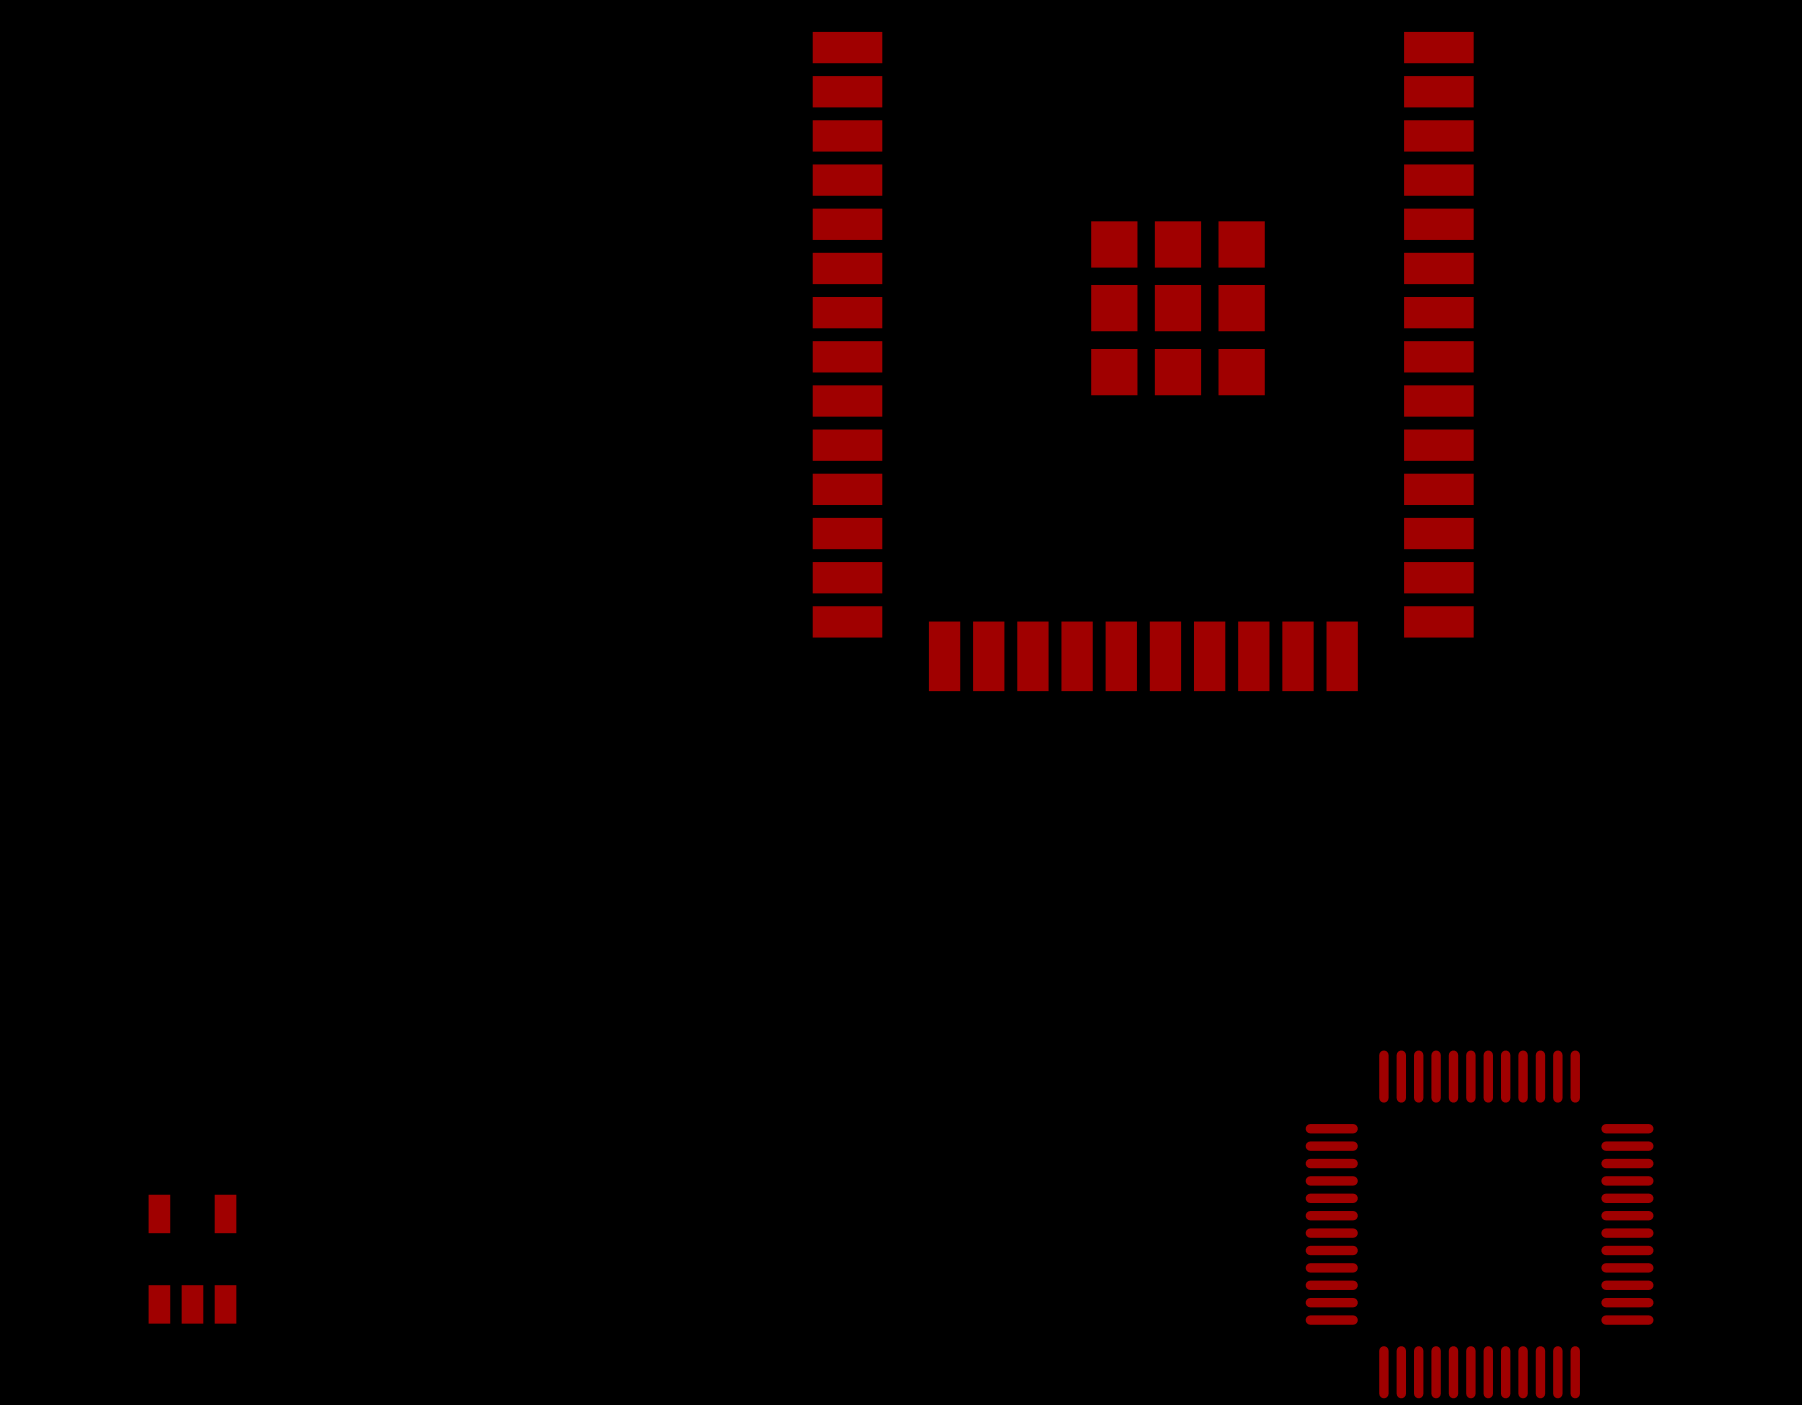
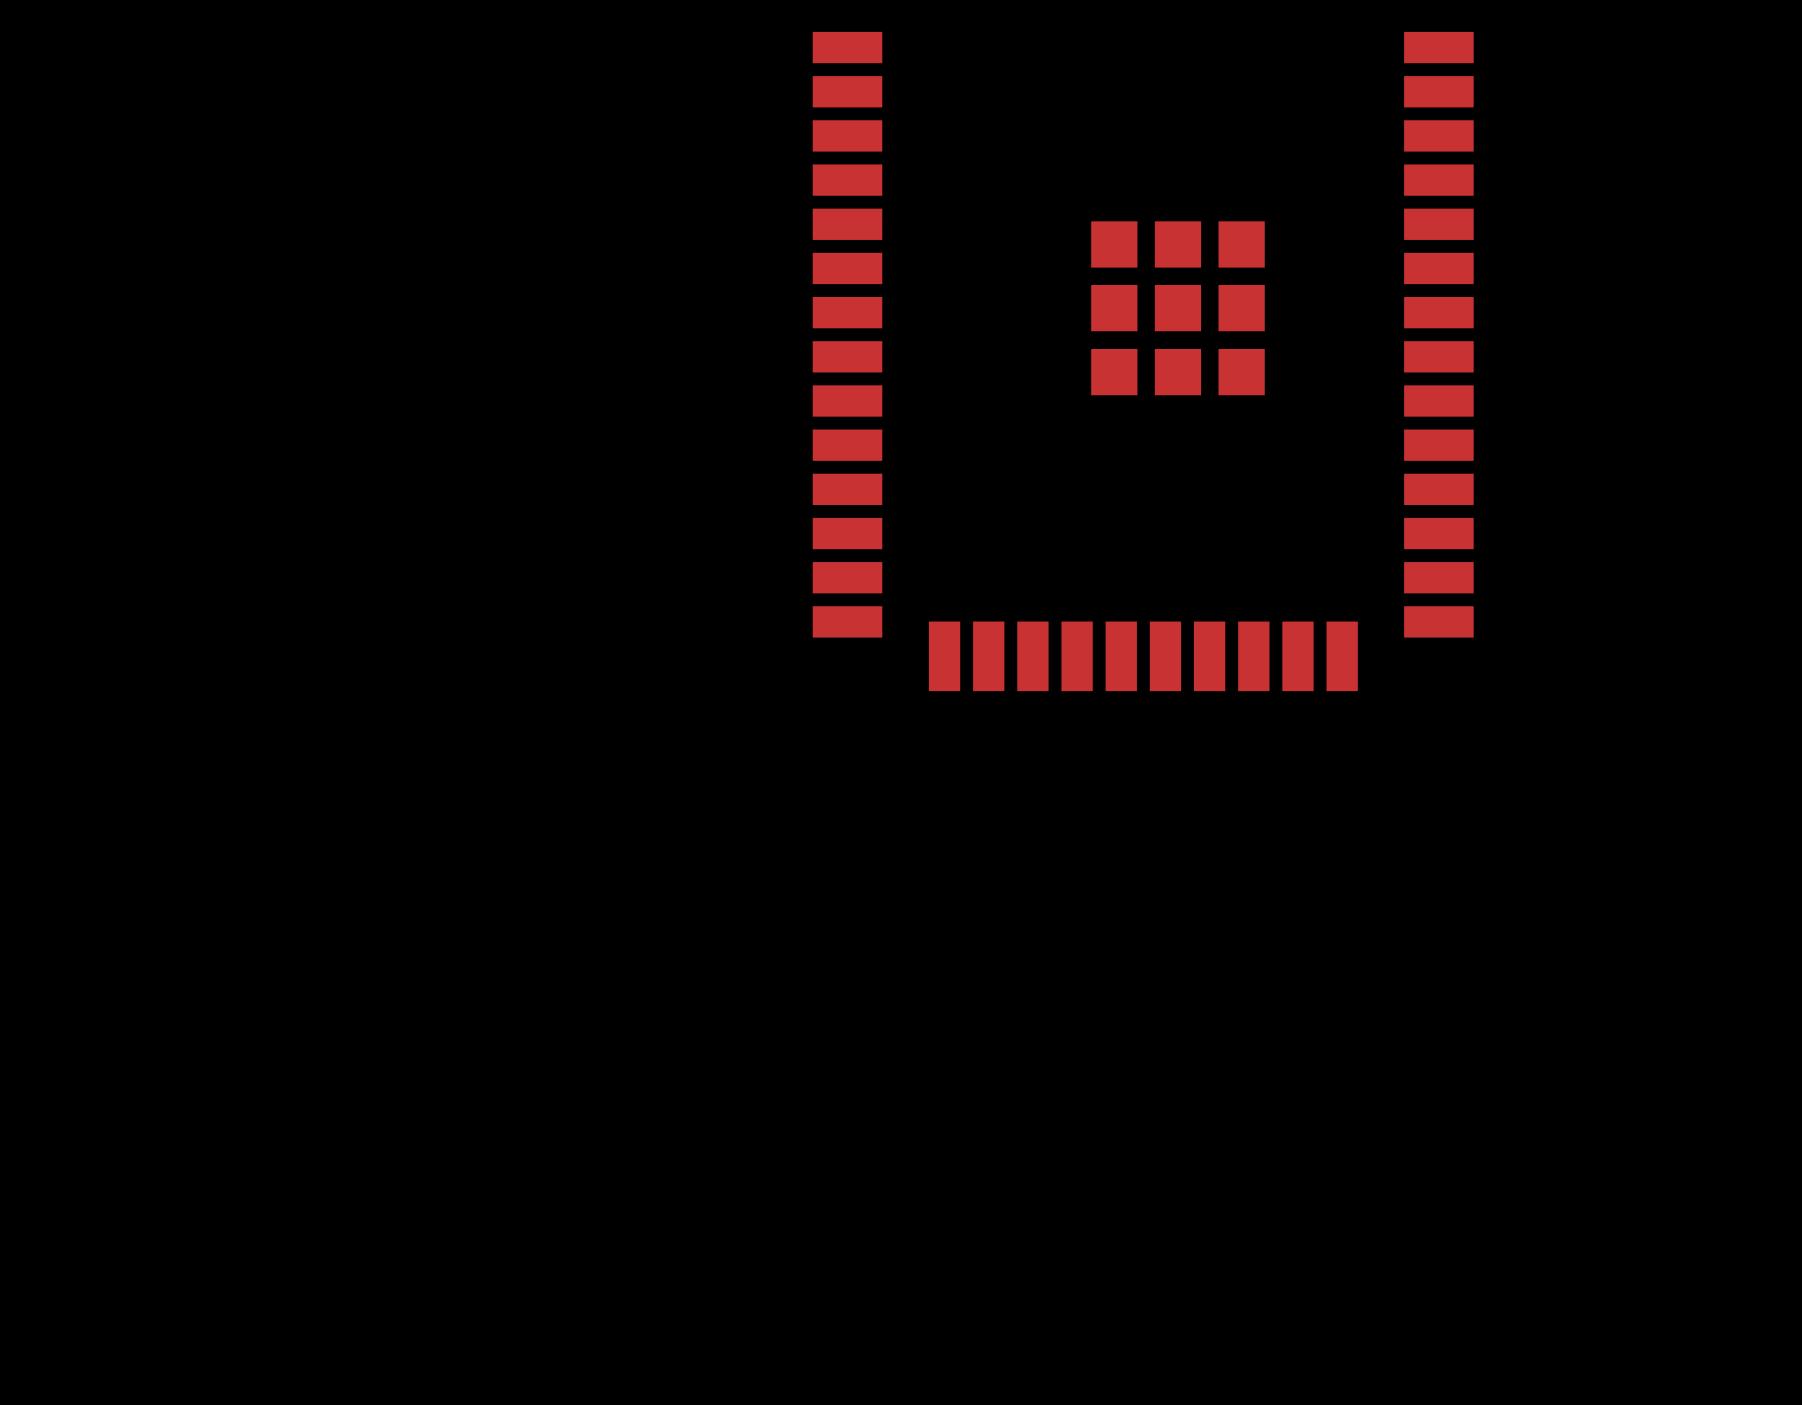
part: (1479, 1224) -> none
part: (192, 1259) -> none

